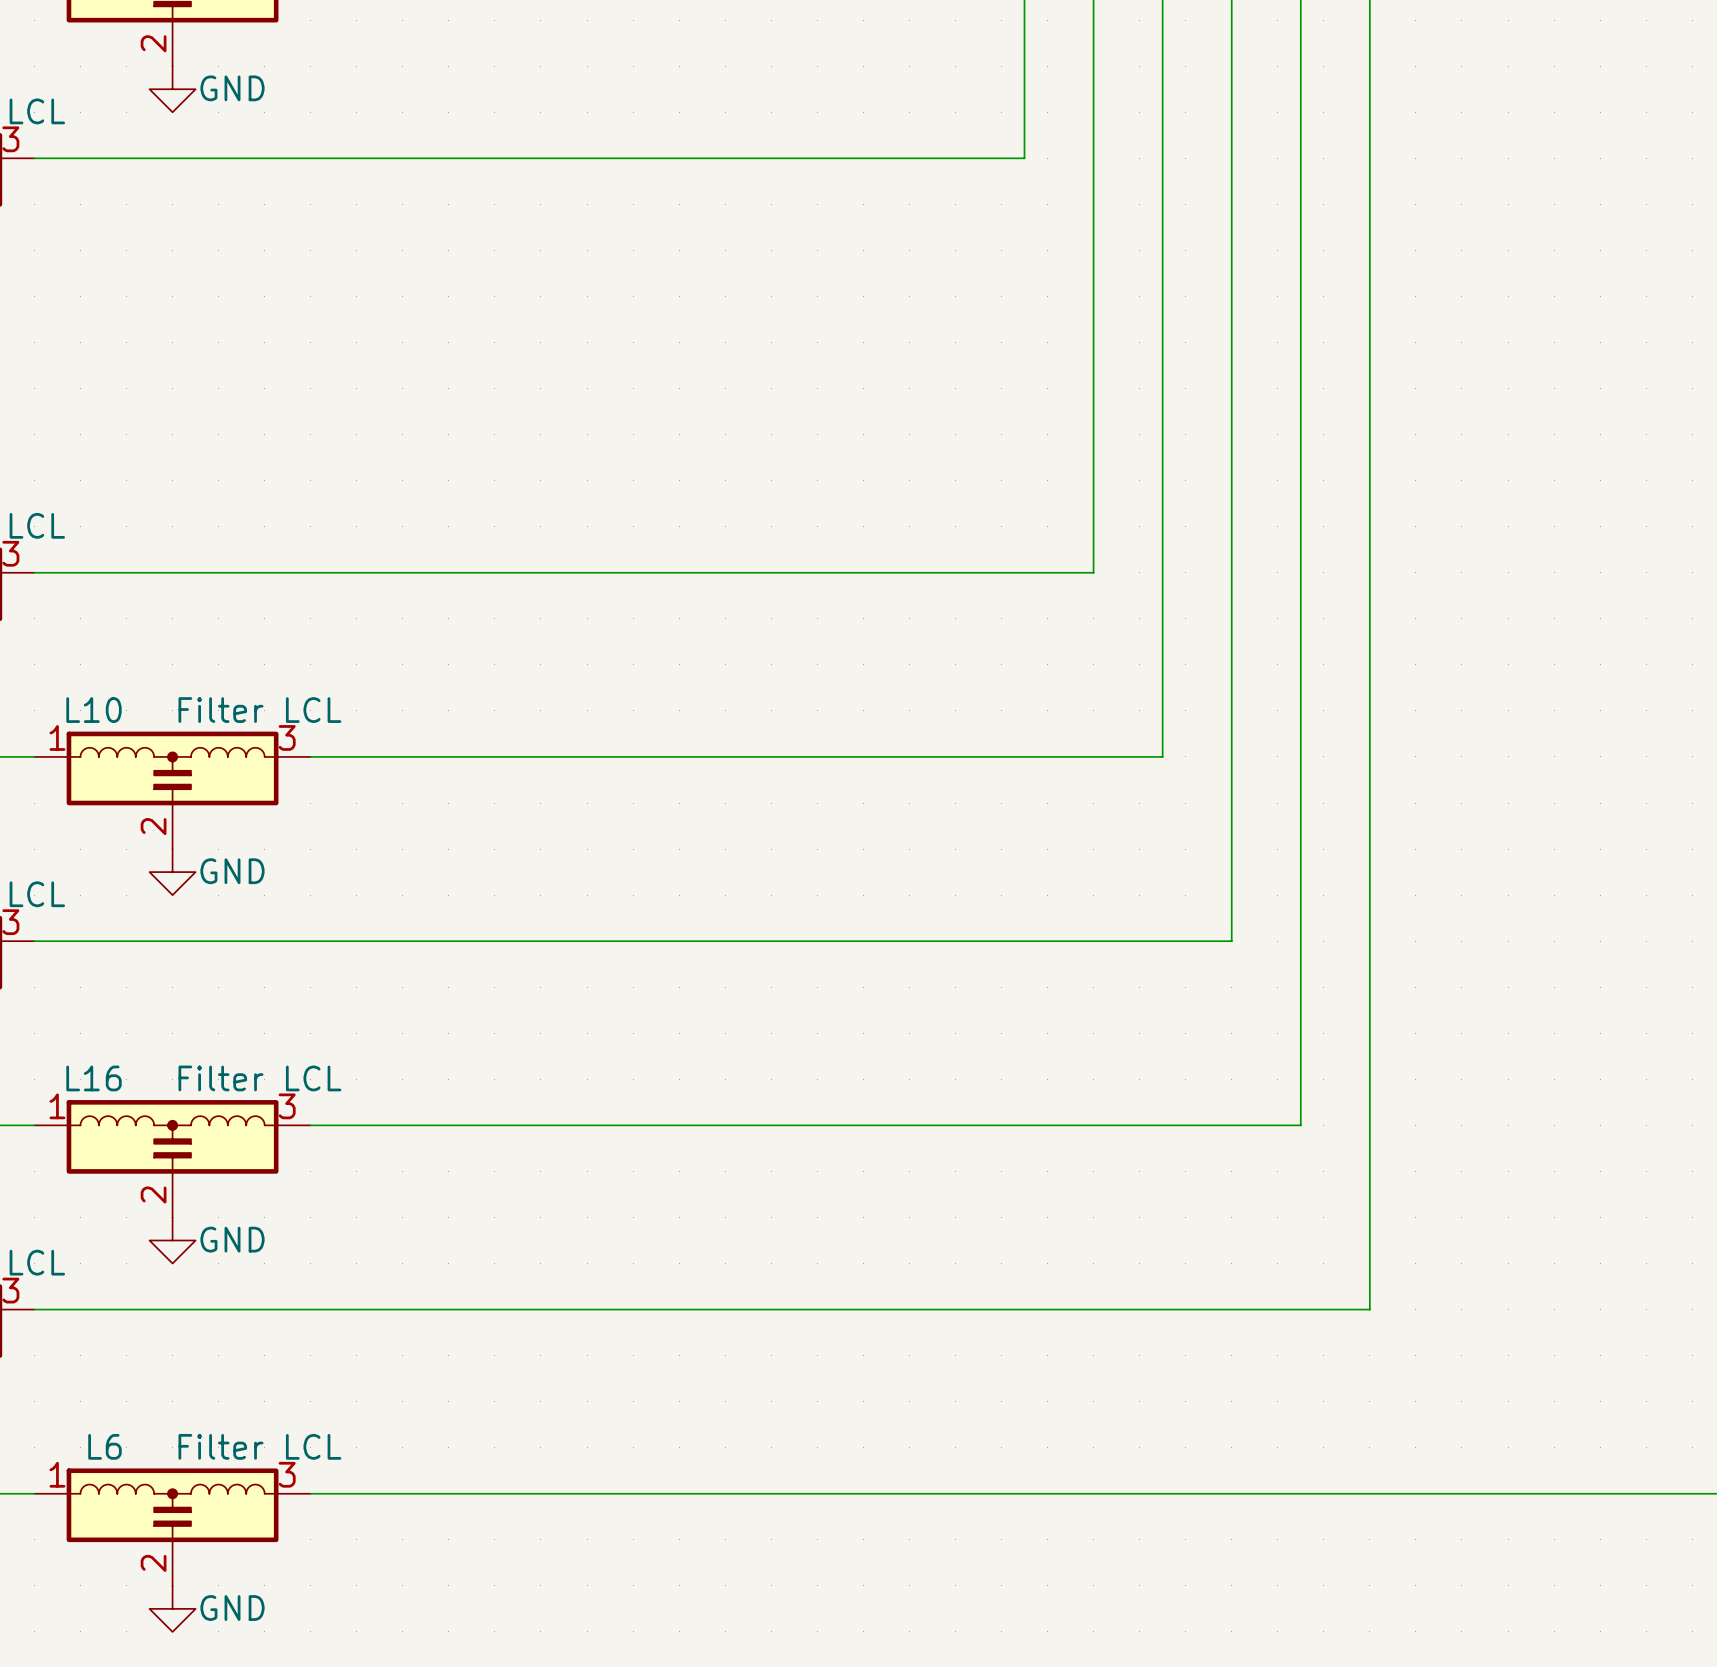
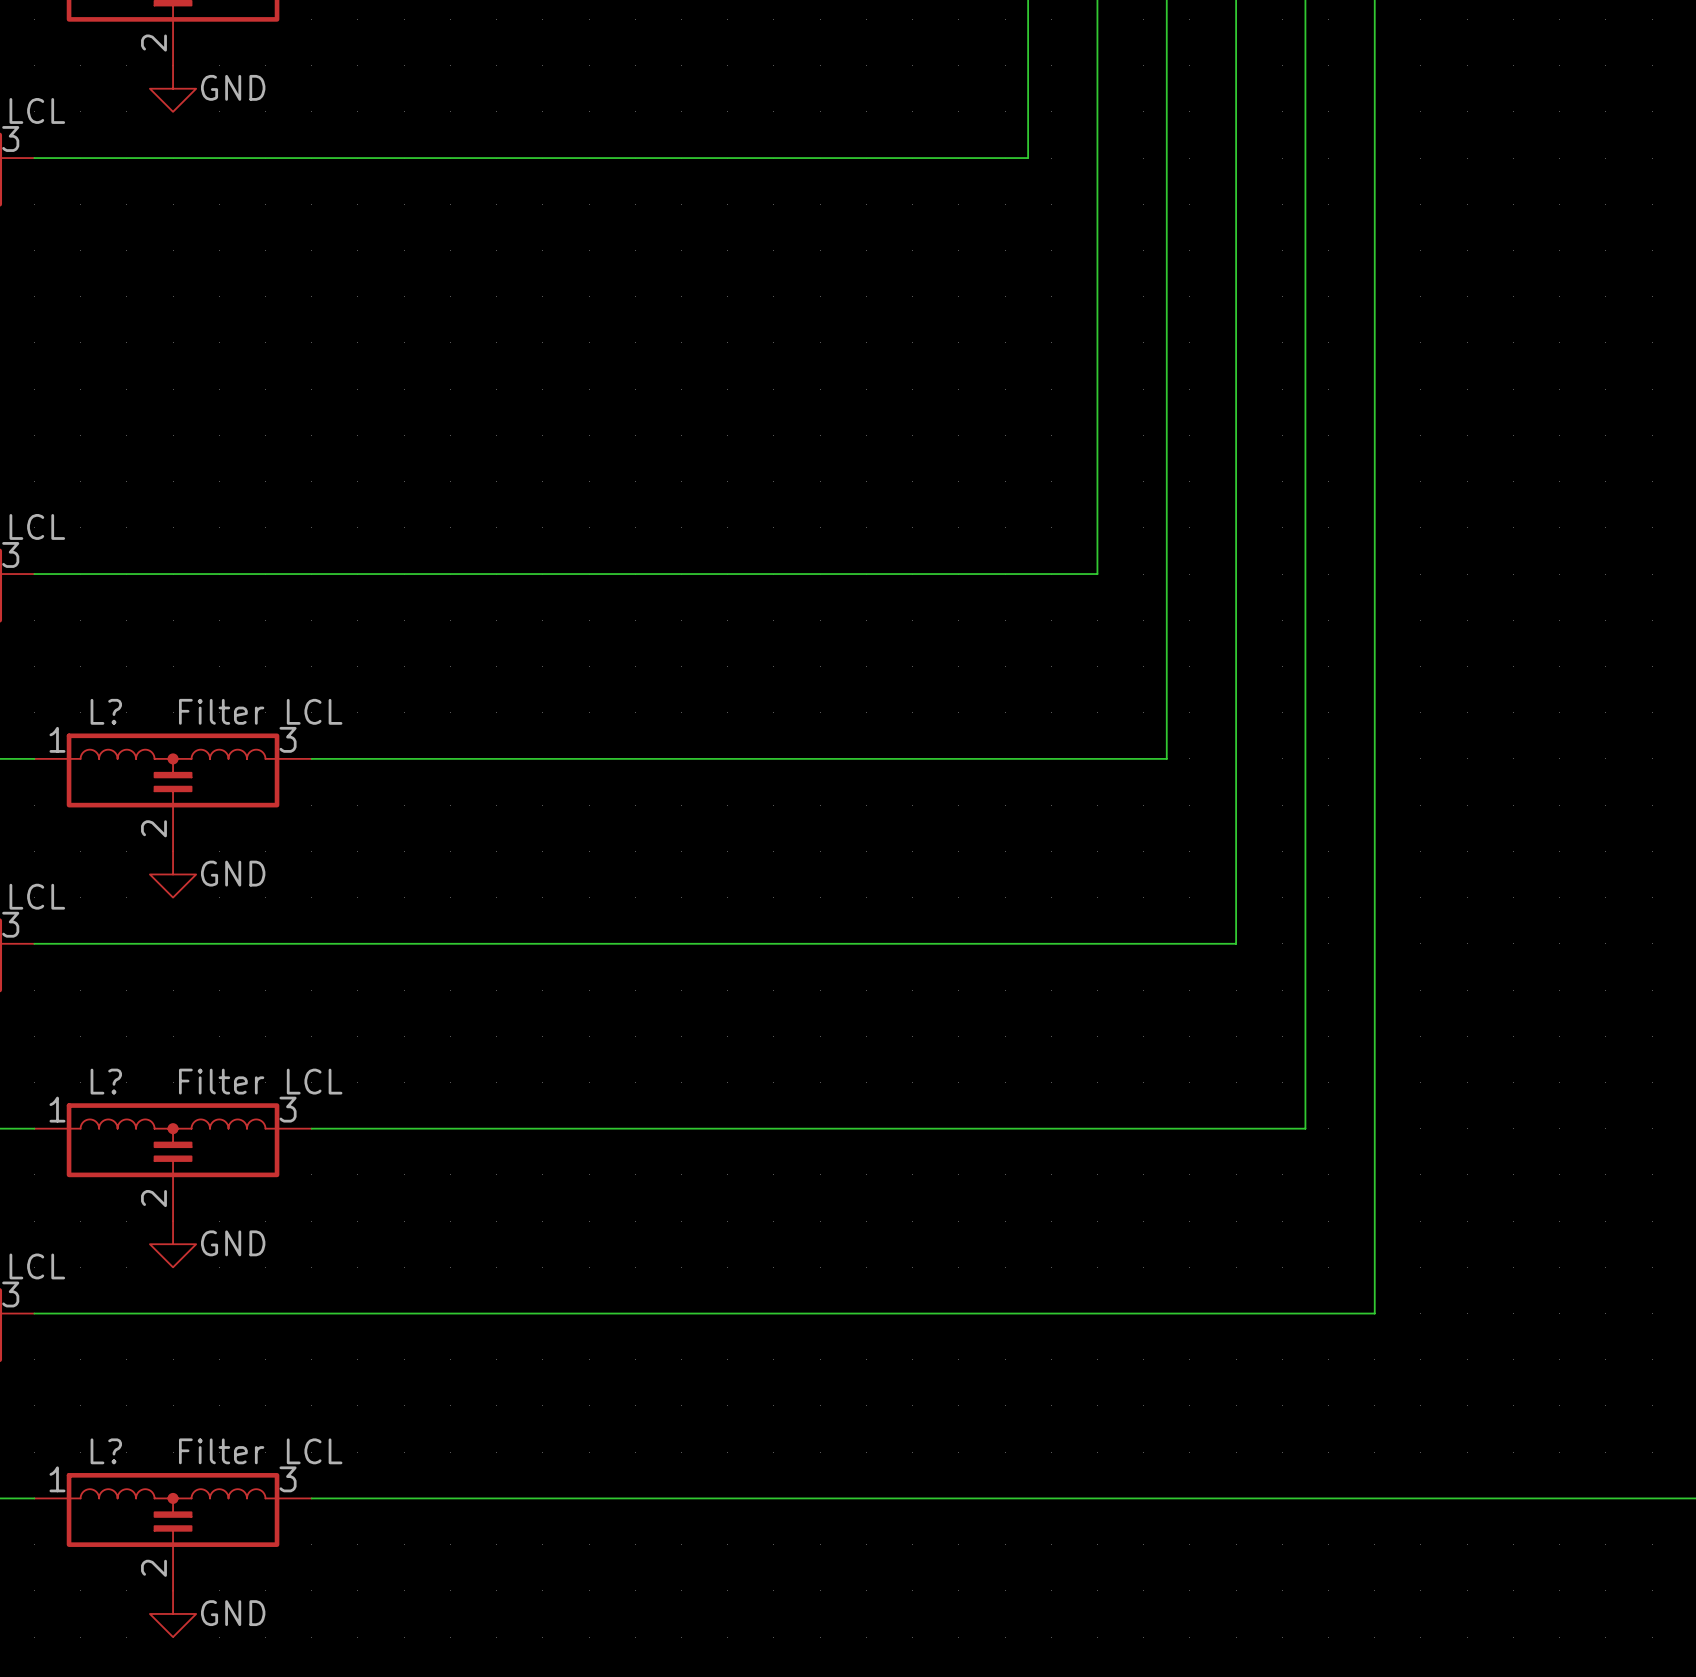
L10 name: L10 (94, 710) -> L? (106, 711)
L16 name: L16 (94, 1078) -> L? (106, 1081)
L6 name: L6 (104, 1446) -> L? (106, 1451)

